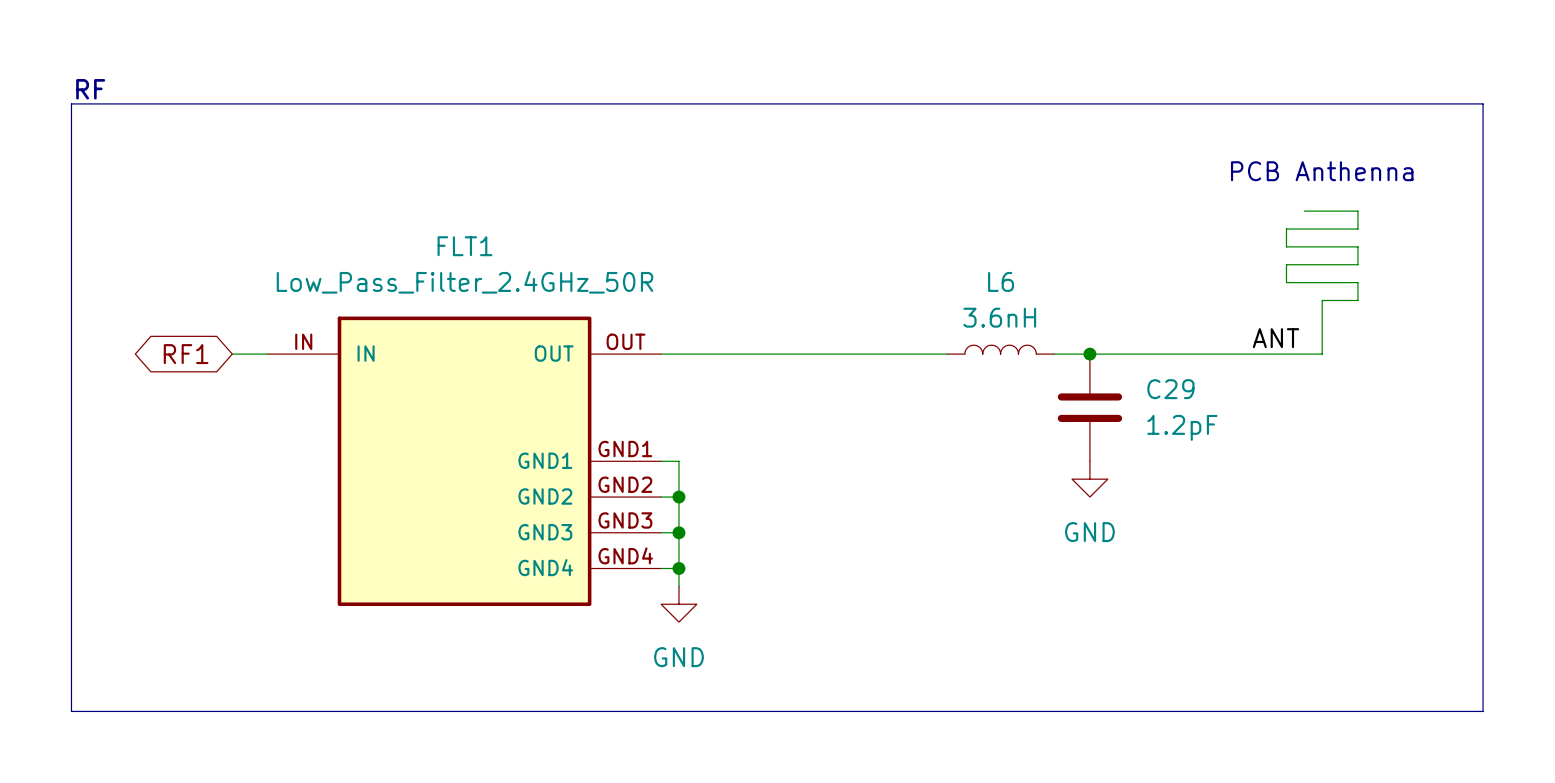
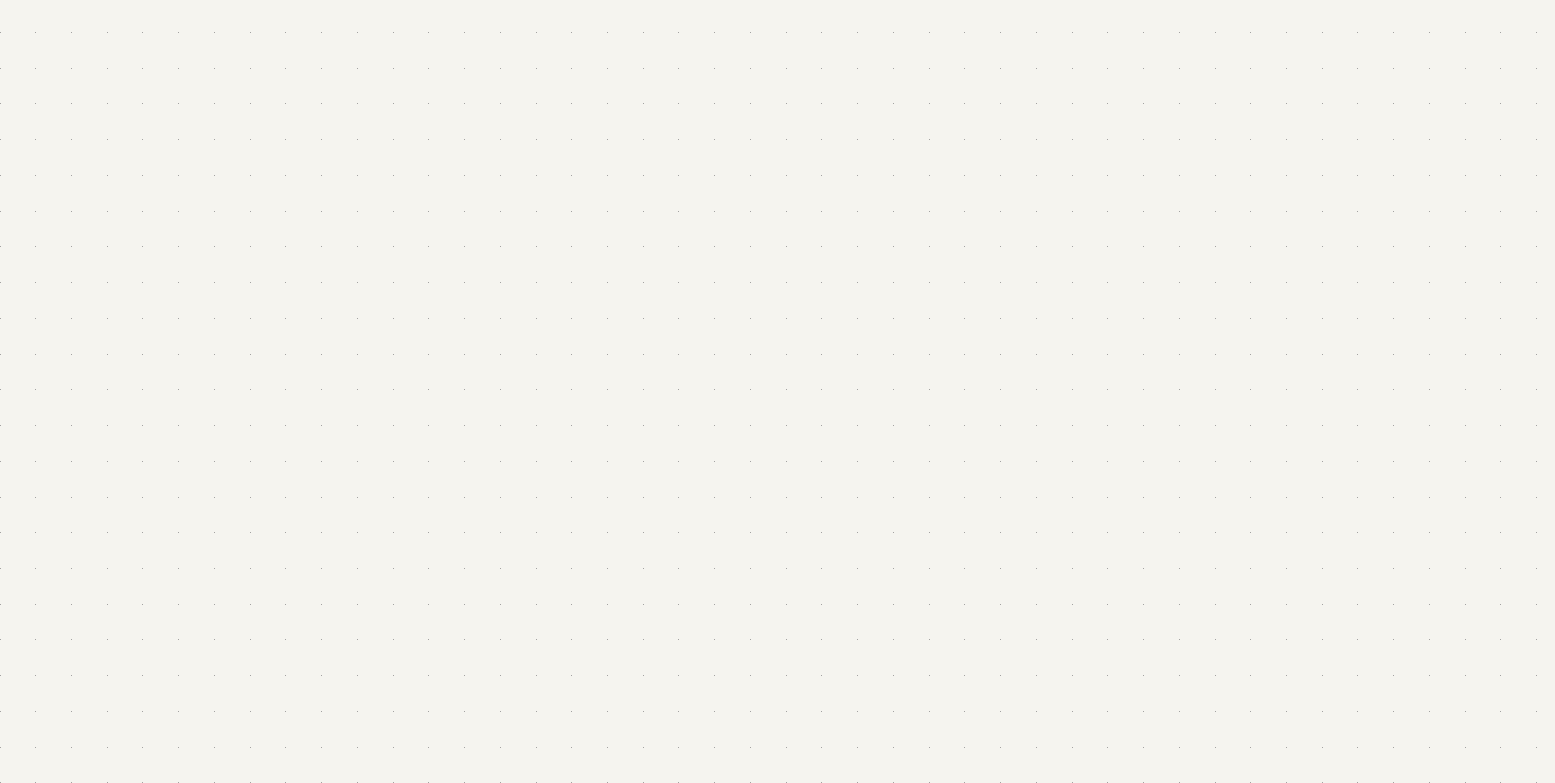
text: RF (90, 89) -> none
line: (71, 103) (1483, 103) (1483, 711) (71, 711) (71, 103) -> none
text: PCB Anthenna (1322, 171) -> none
wire: (1304, 211) (1357, 211) (1357, 229) (1286, 229) (1286, 246) (1357, 246) (1357, 264) (1286, 264) (1286, 282) (1357, 282) (1357, 300) (1322, 300) (1322, 354) (1054, 354) -> none
label: ANT (1275, 338) -> none
L6: 3.6nH (1000, 349) -> none
global label: RF1 (186, 354) -> none
wire: (232, 354) (268, 354) -> none
wire: (661, 354) (947, 354) -> none
junction: (1089, 354) -> none
C29: 1.2pF (1089, 407) -> none
FLT1: Low_Pass_Filter_2.4GHz_50R (464, 461) -> none
wire: (661, 461) (678, 461) (678, 586) -> none
power symbol: GND (1089, 479) -> none
wire: (661, 497) (678, 497) -> none
junction: (678, 497) -> none
wire: (661, 532) (678, 532) -> none
junction: (678, 532) -> none
wire: (661, 568) (678, 568) -> none
junction: (678, 568) -> none
power symbol: GND (678, 604) -> none

